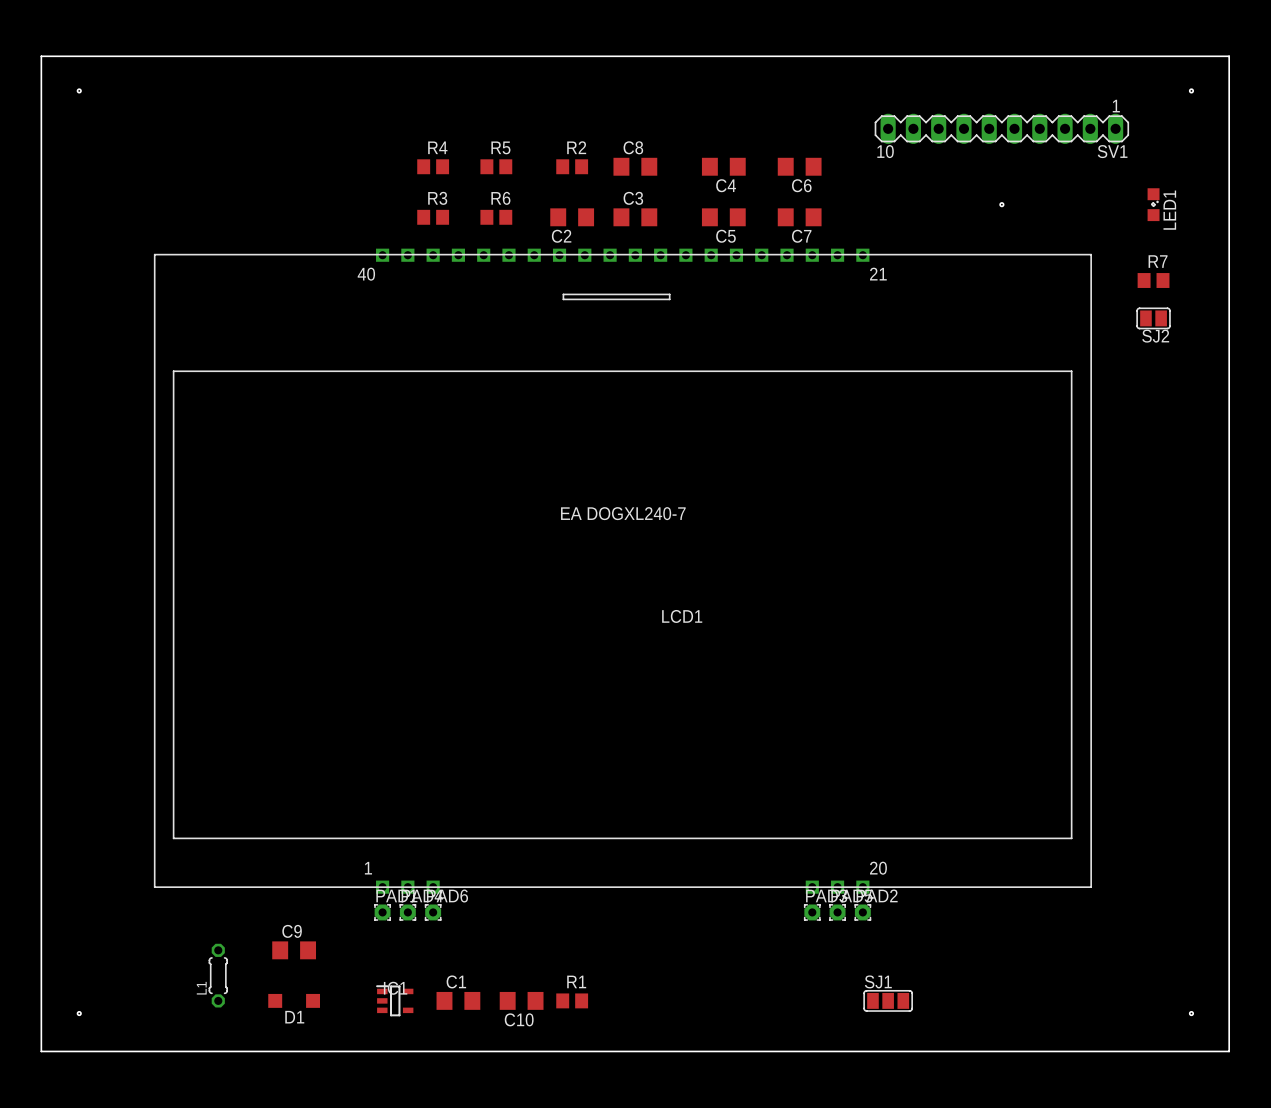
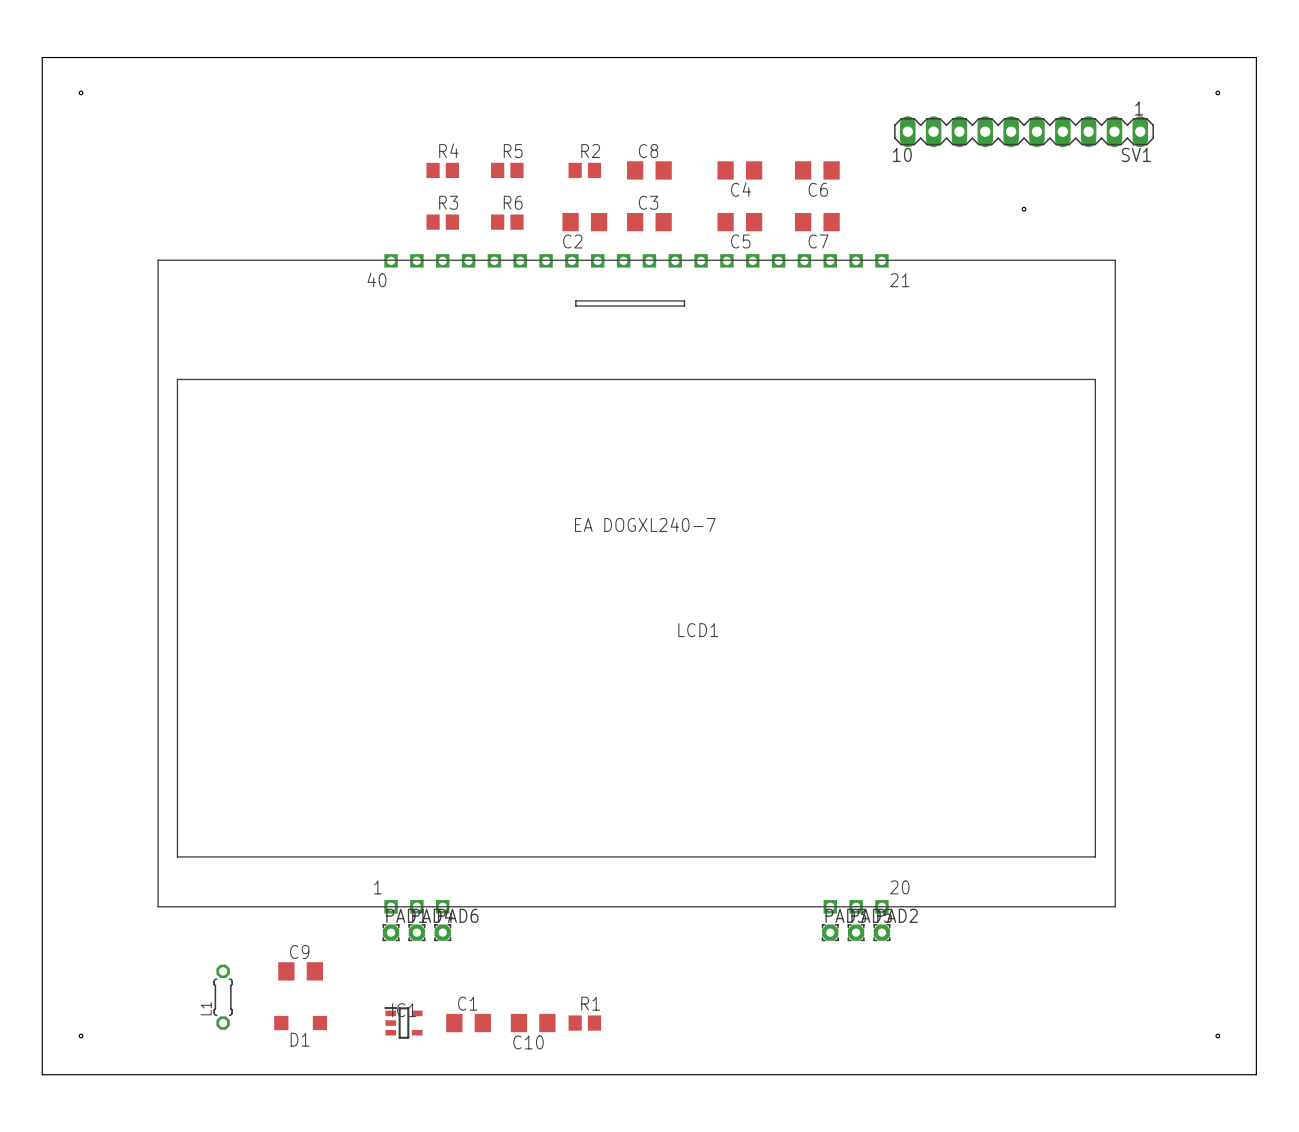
LED1: (1153, 204) -> none
R7: (1153, 280) -> none
SJ2: (1153, 318) -> none
SJ1: (888, 1000) -> none

